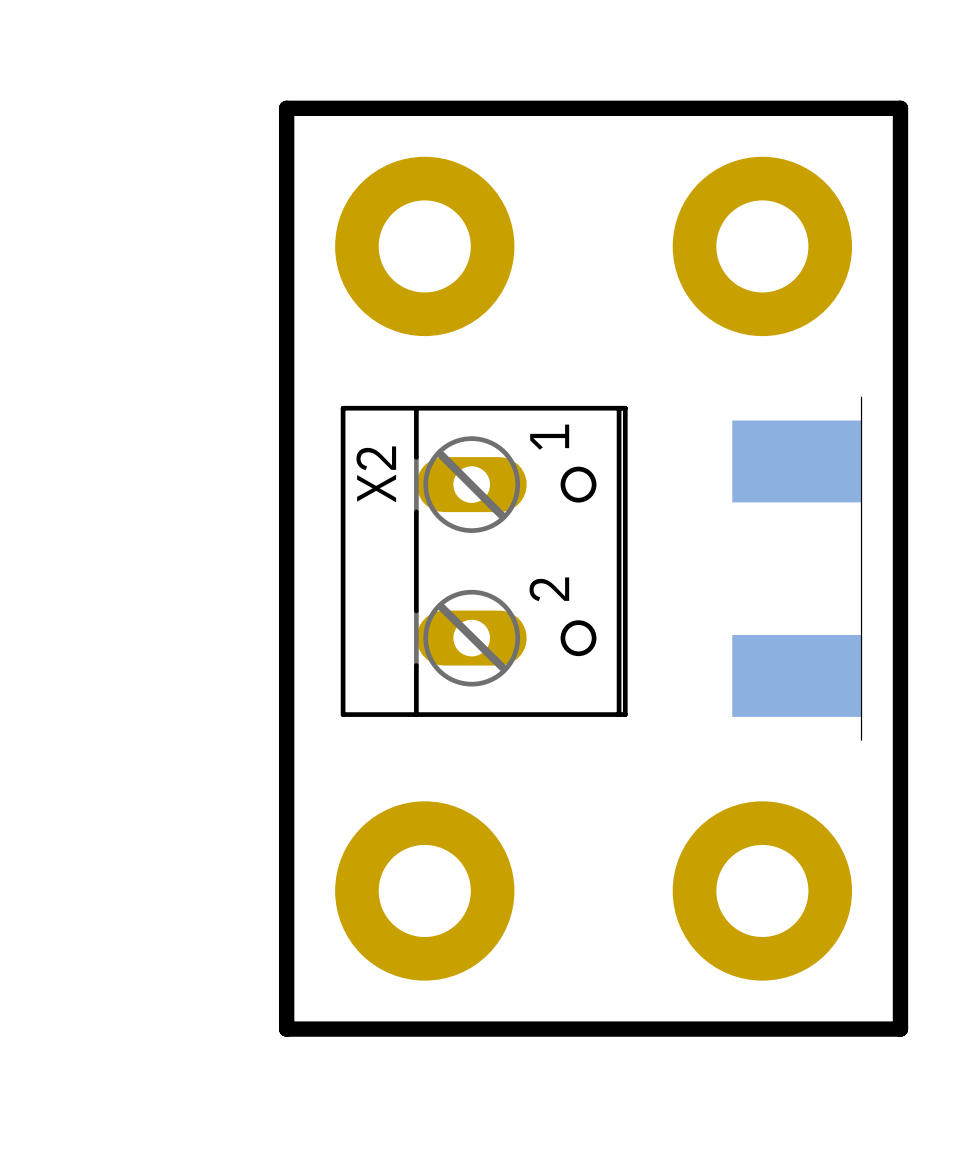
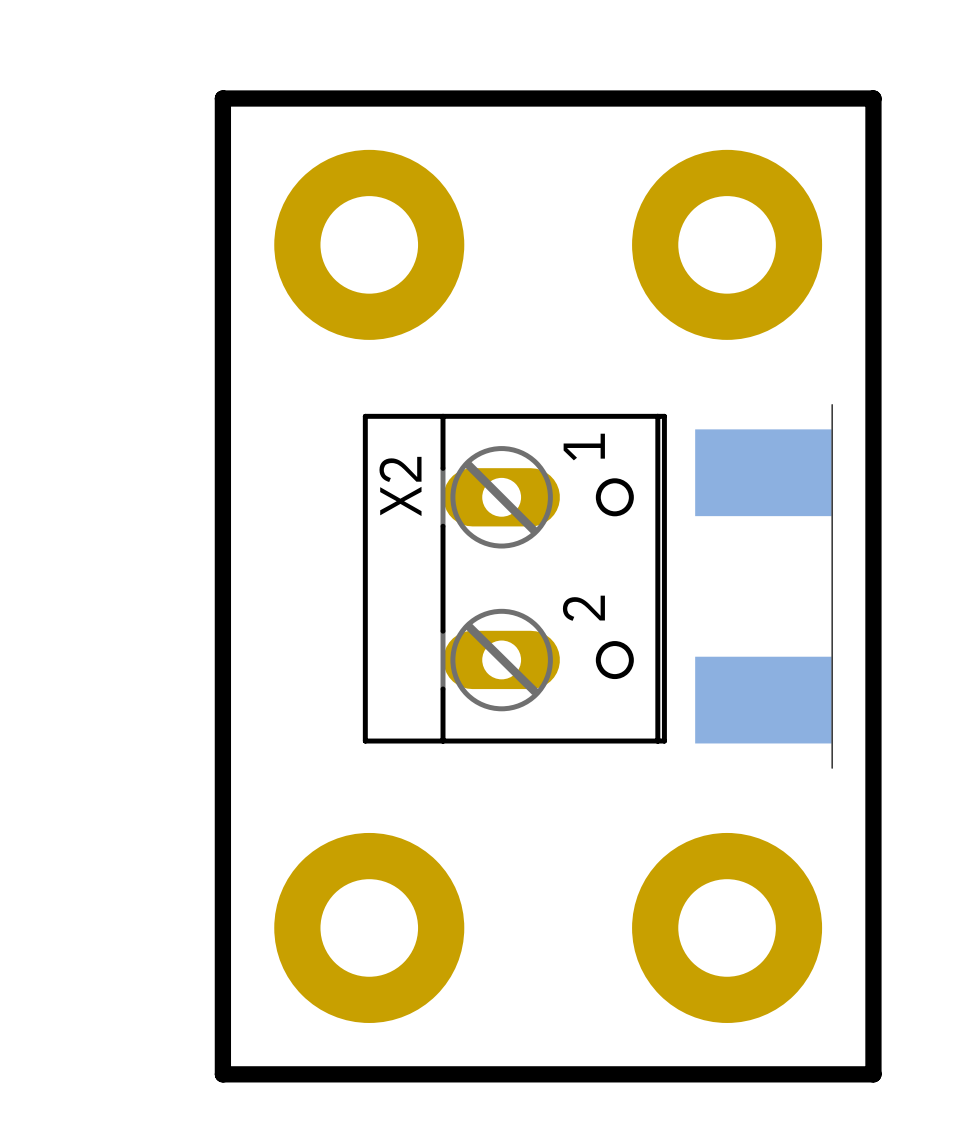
X2 position: (484, 561) -> (514, 578)

